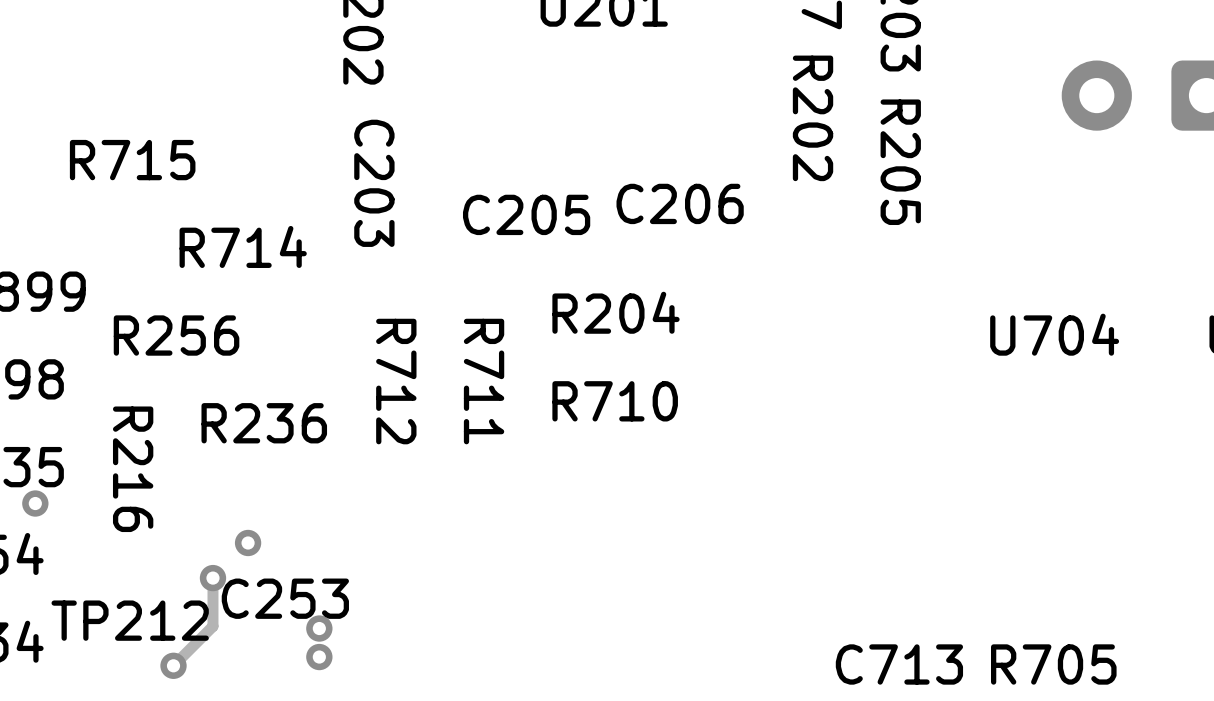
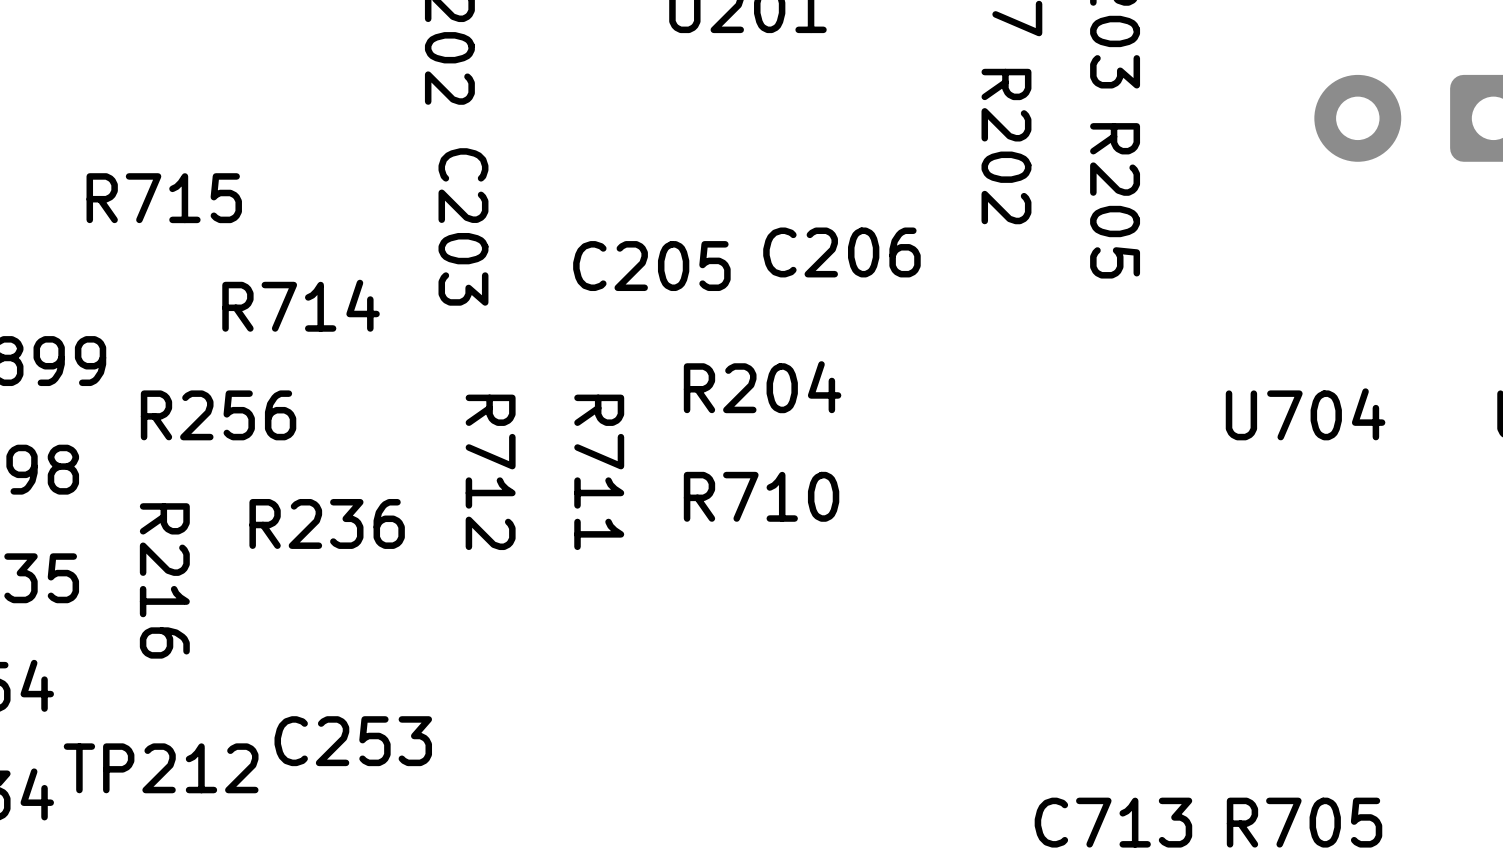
via: (35, 503) -> none
via: (248, 542) -> none
track: (212, 578) (212, 626) (173, 665) -> none
via: (212, 578) -> none
via: (319, 628) -> none
via: (319, 657) -> none
via: (173, 665) -> none

